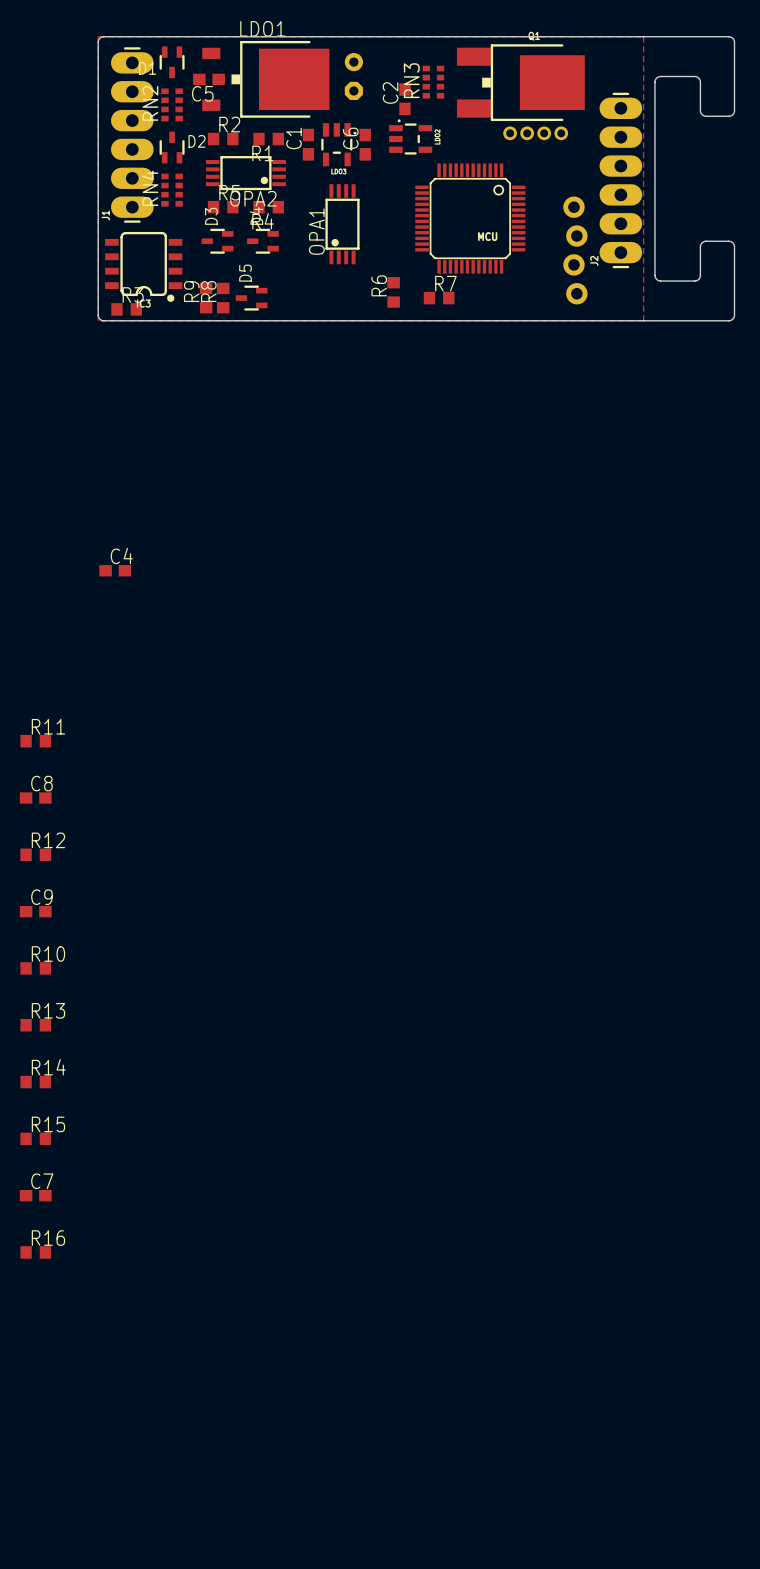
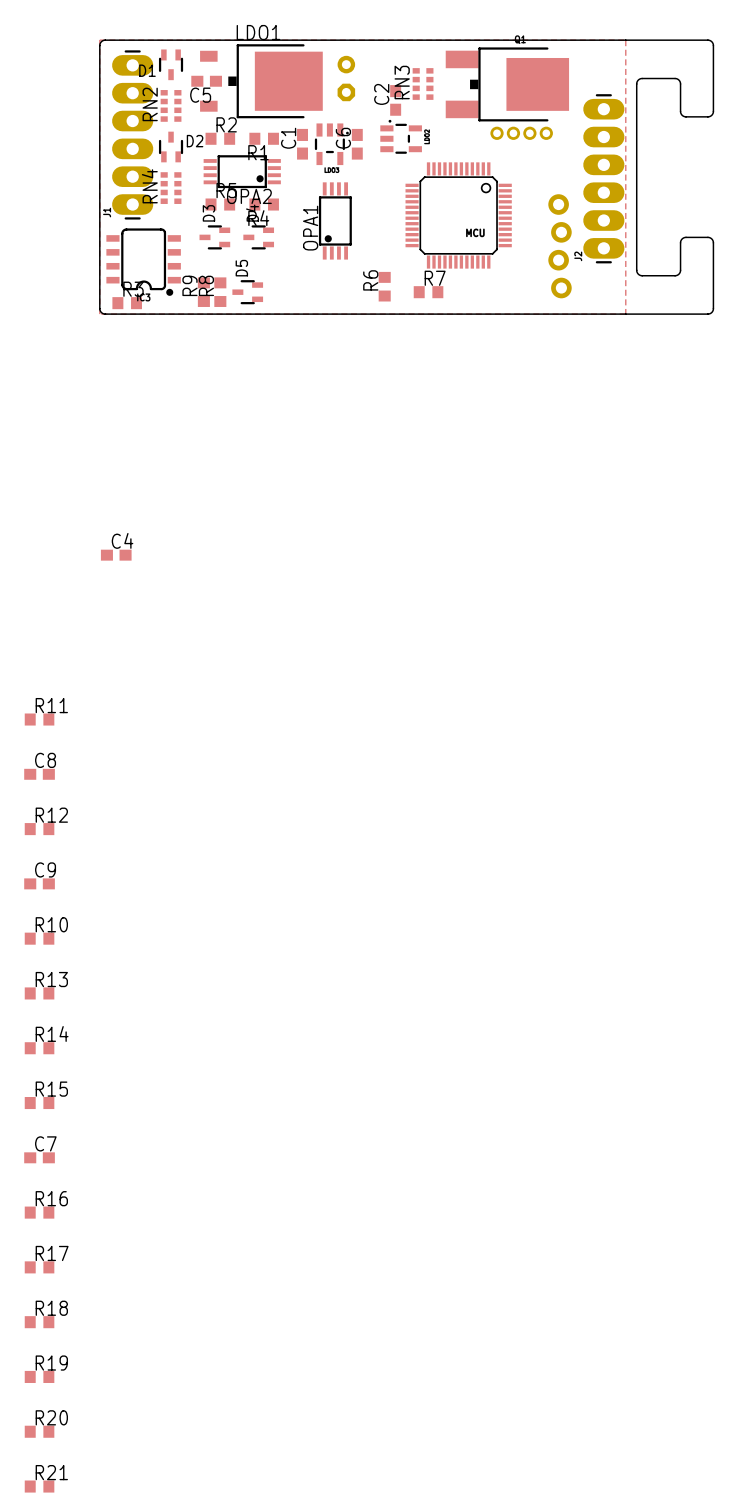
R17: none -> (39, 1267)
R18: none -> (39, 1322)
R19: none -> (39, 1376)
R20: none -> (39, 1431)
R21: none -> (39, 1486)

